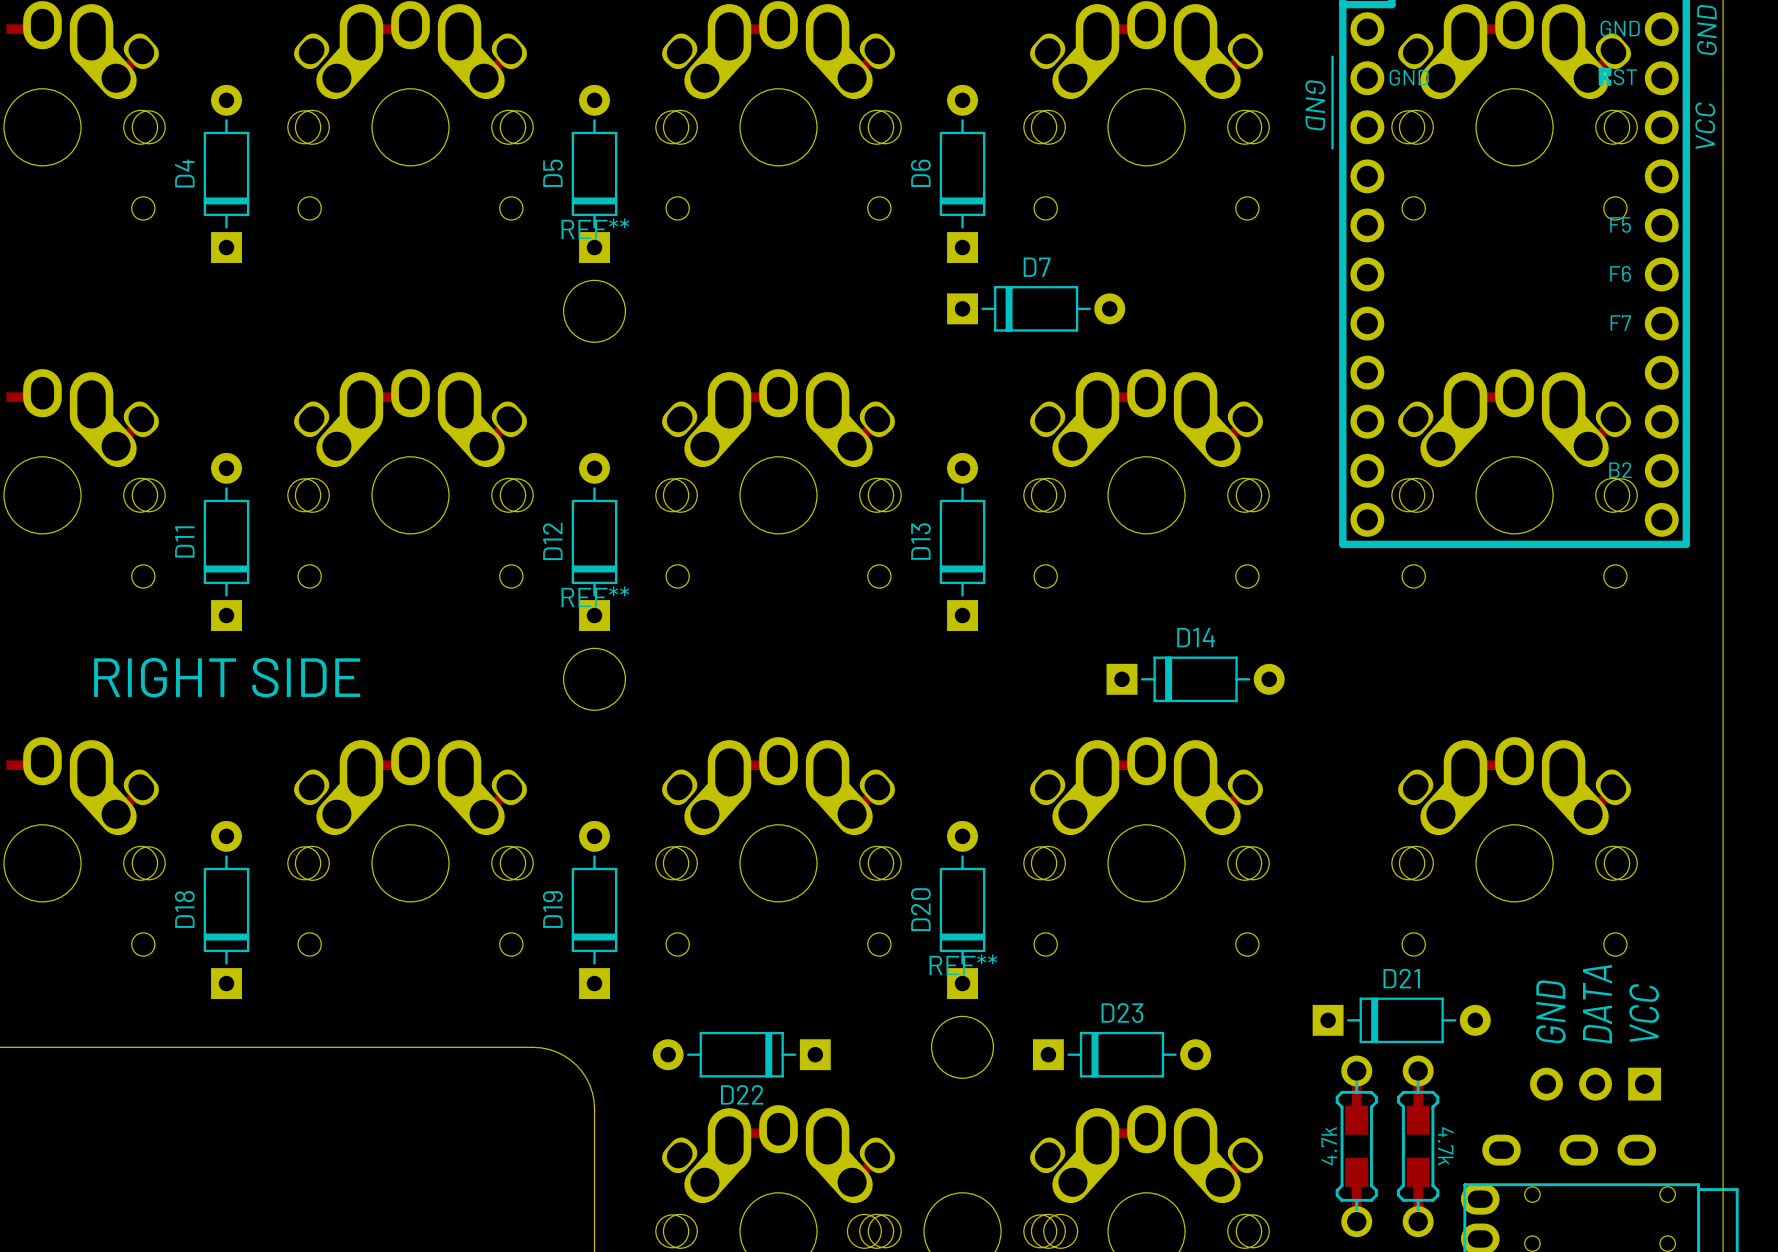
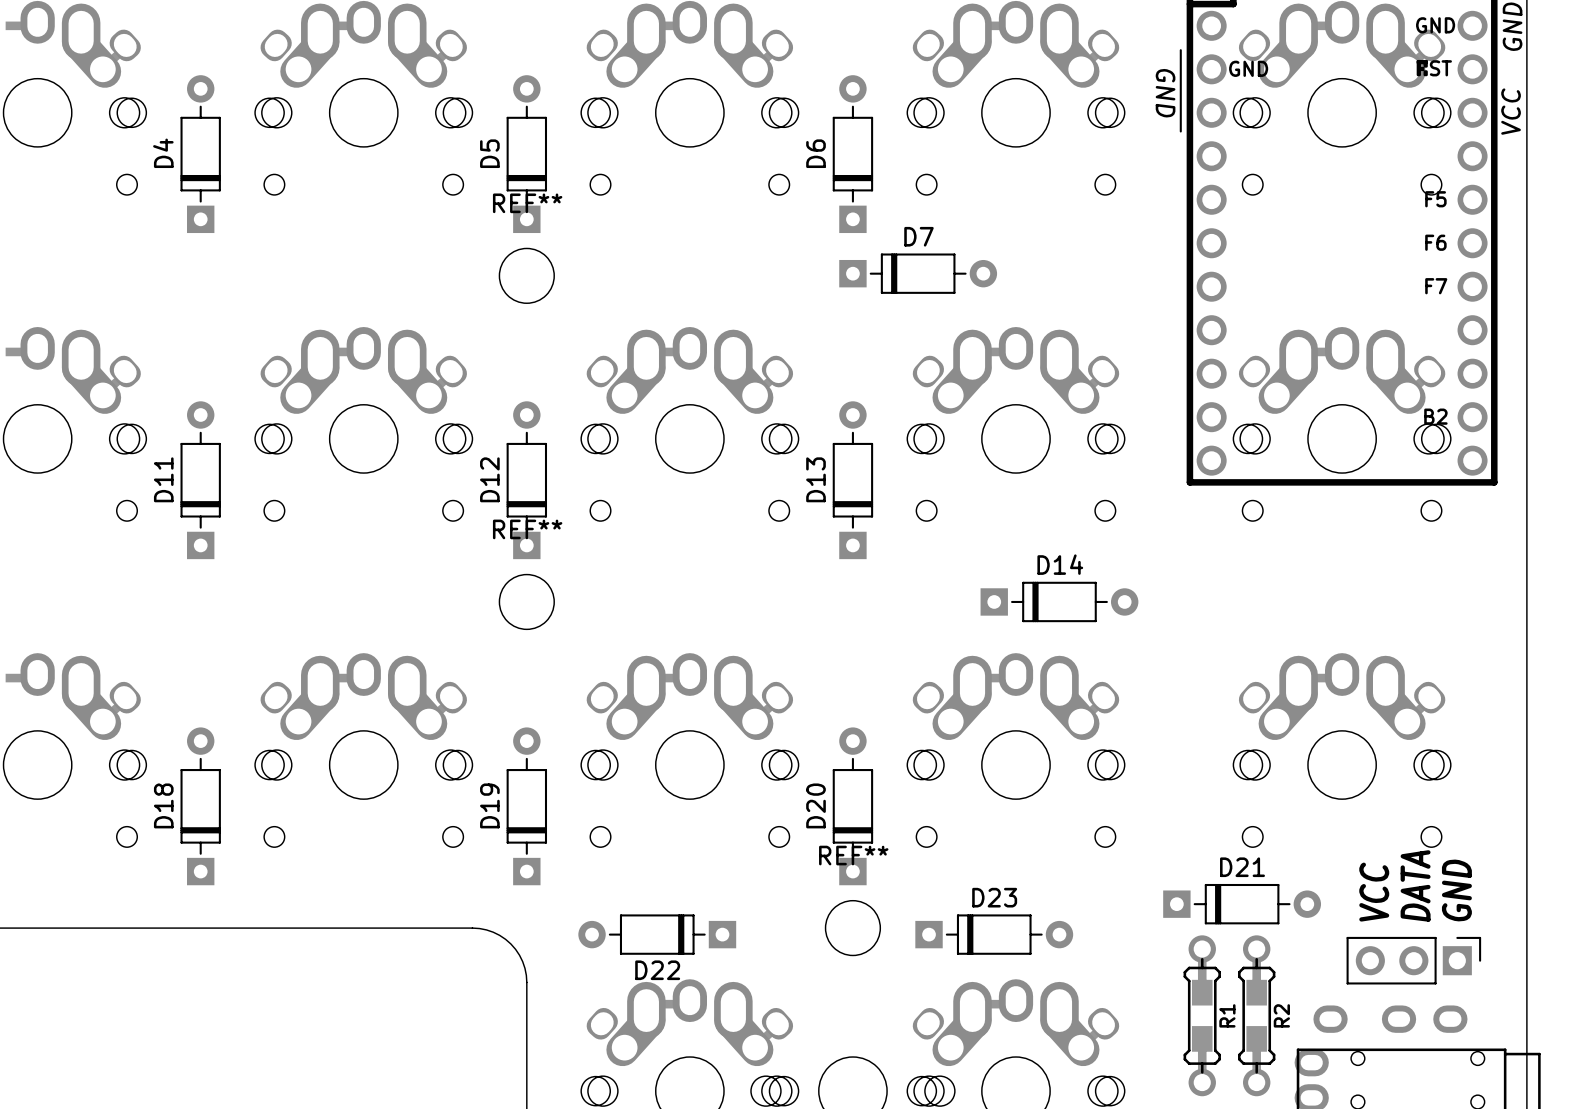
text: RIGHT SIDE (227, 677) -> none
text: GND (1550, 1011) -> VCC (1374, 892)
text: VCC (1644, 1012) -> GND (1456, 890)
part footprint: [1530, 1067, 1662, 1101] -> [1346, 936, 1482, 985]
text: 4.7k (1329, 1146) -> none
R1 name: none -> R1 (1227, 1015)
text: 4.7k (1445, 1146) -> none
R2 name: none -> R2 (1281, 1015)

